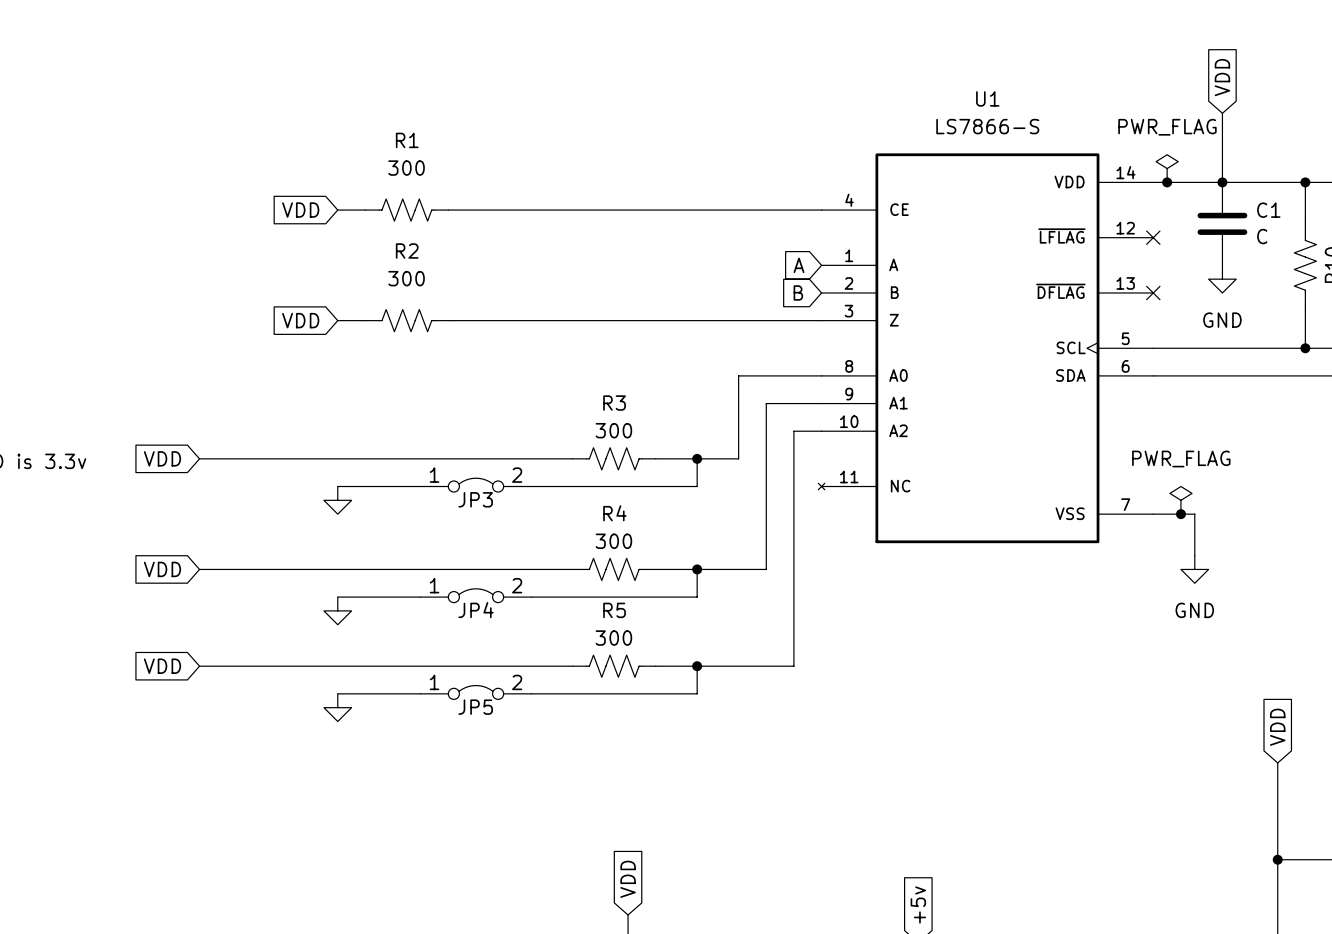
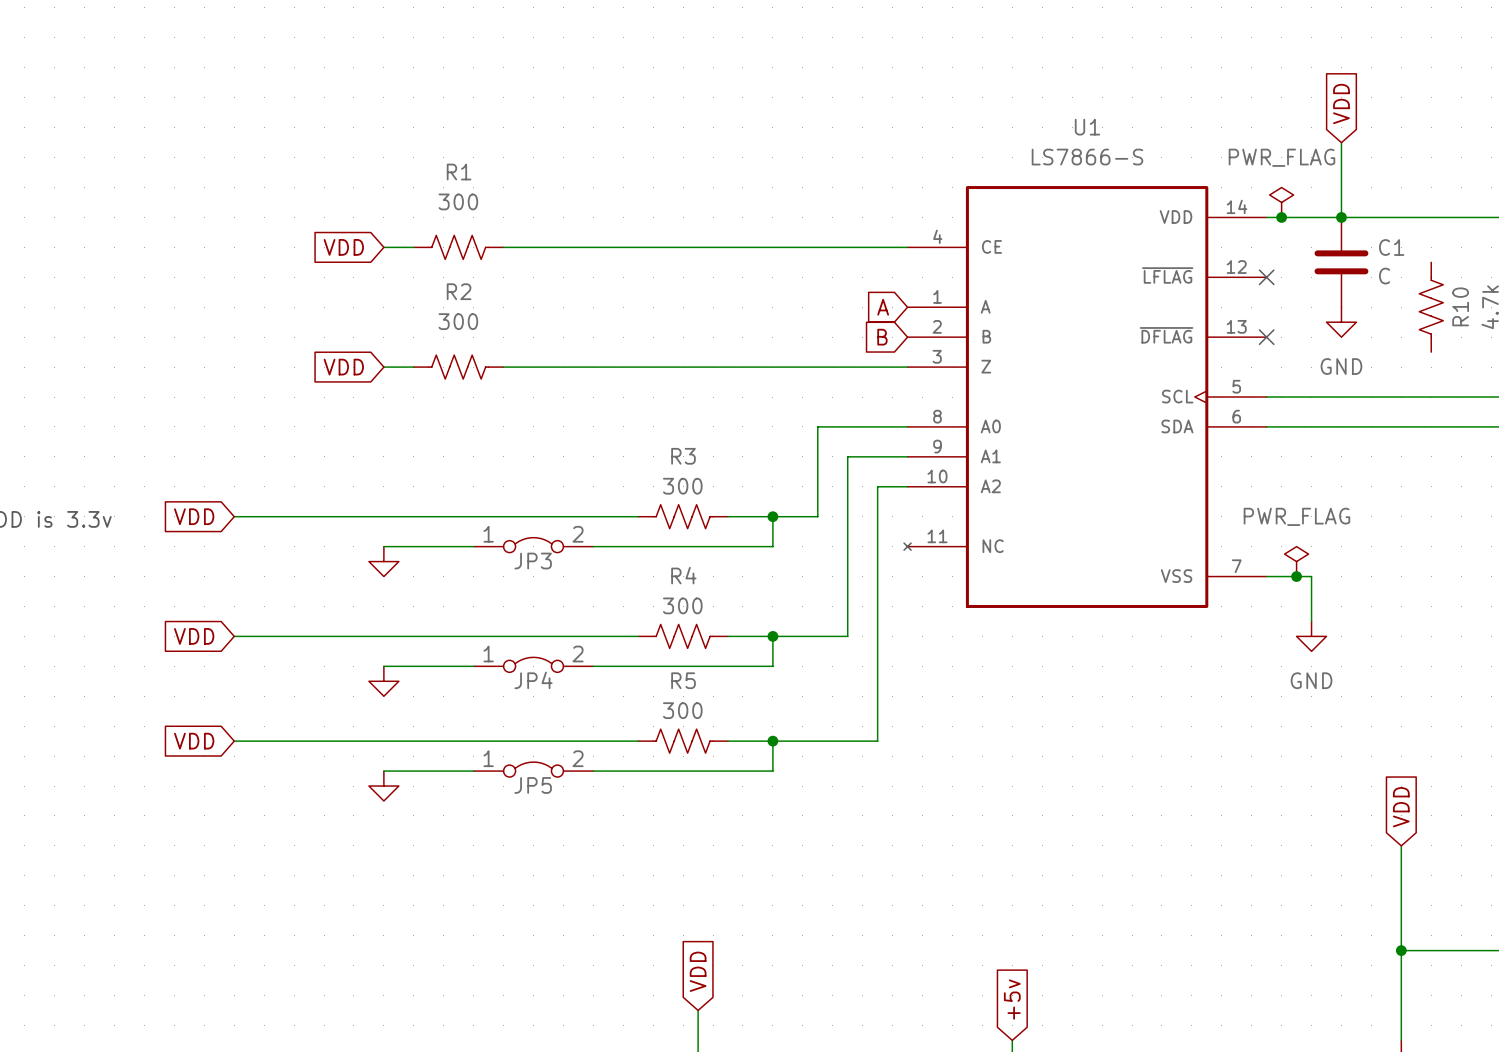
wire: (1305, 182) (1305, 223) -> none
junction: (1305, 182) -> none
wire: (1305, 306) (1305, 348) -> none
junction: (1305, 348) -> none

